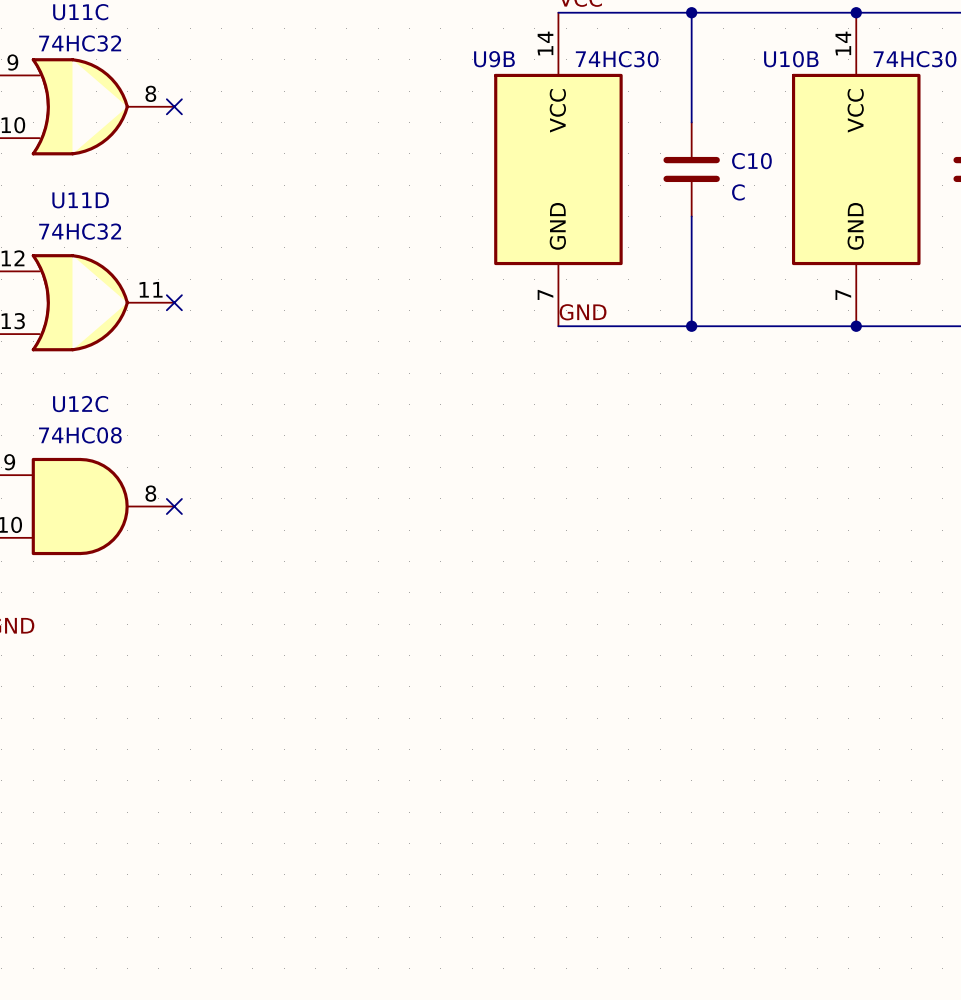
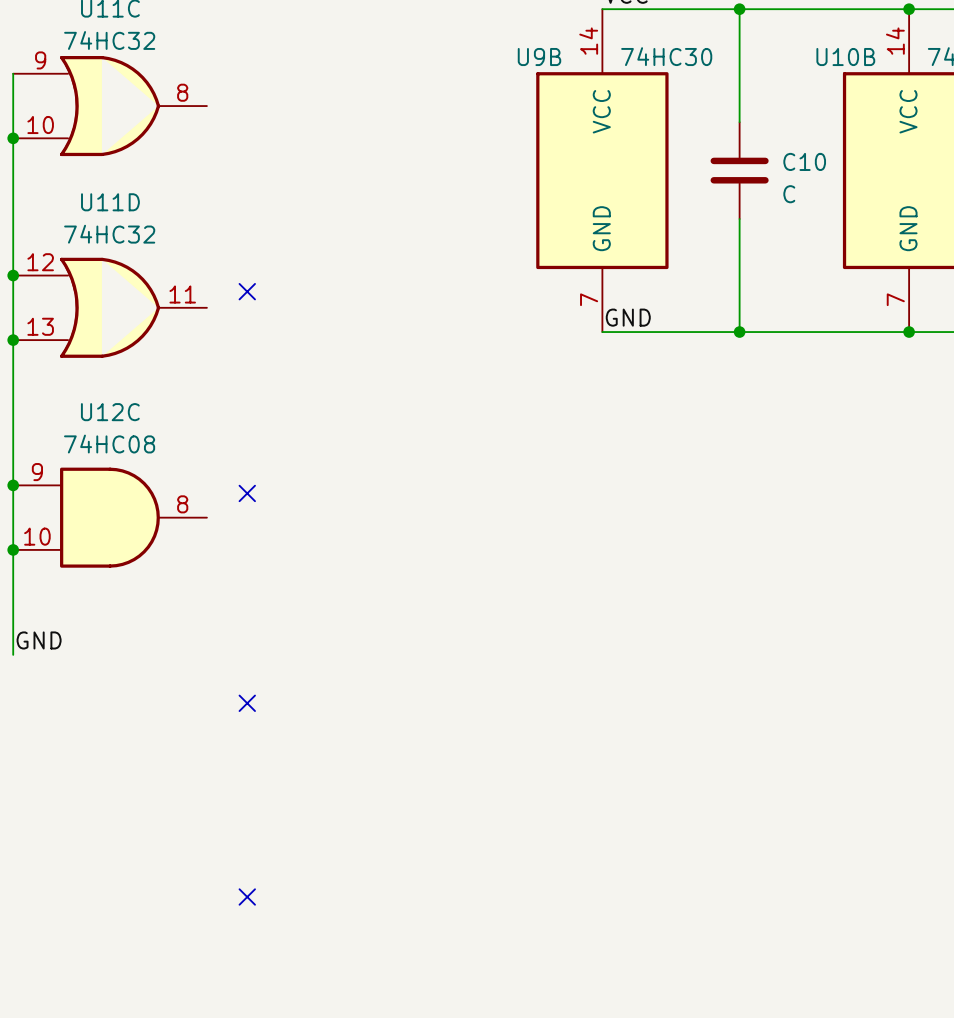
no-connect mark: (174, 106) -> none
no-connect mark position: (174, 302) -> (247, 291)
no-connect mark position: (174, 506) -> (247, 493)
no-connect mark: none -> (247, 703)
no-connect mark: none -> (247, 897)

